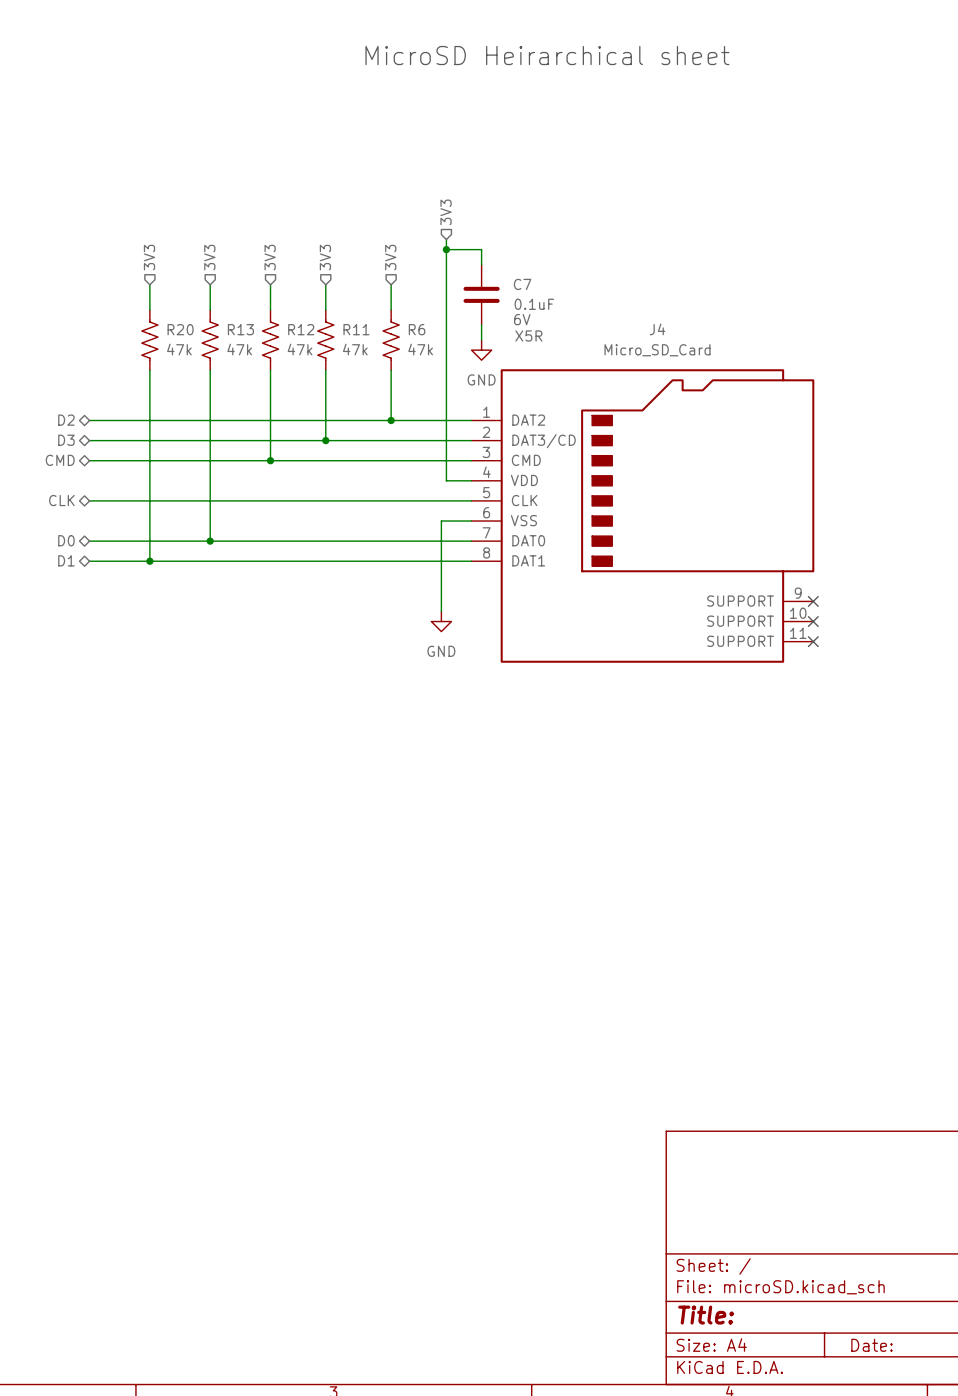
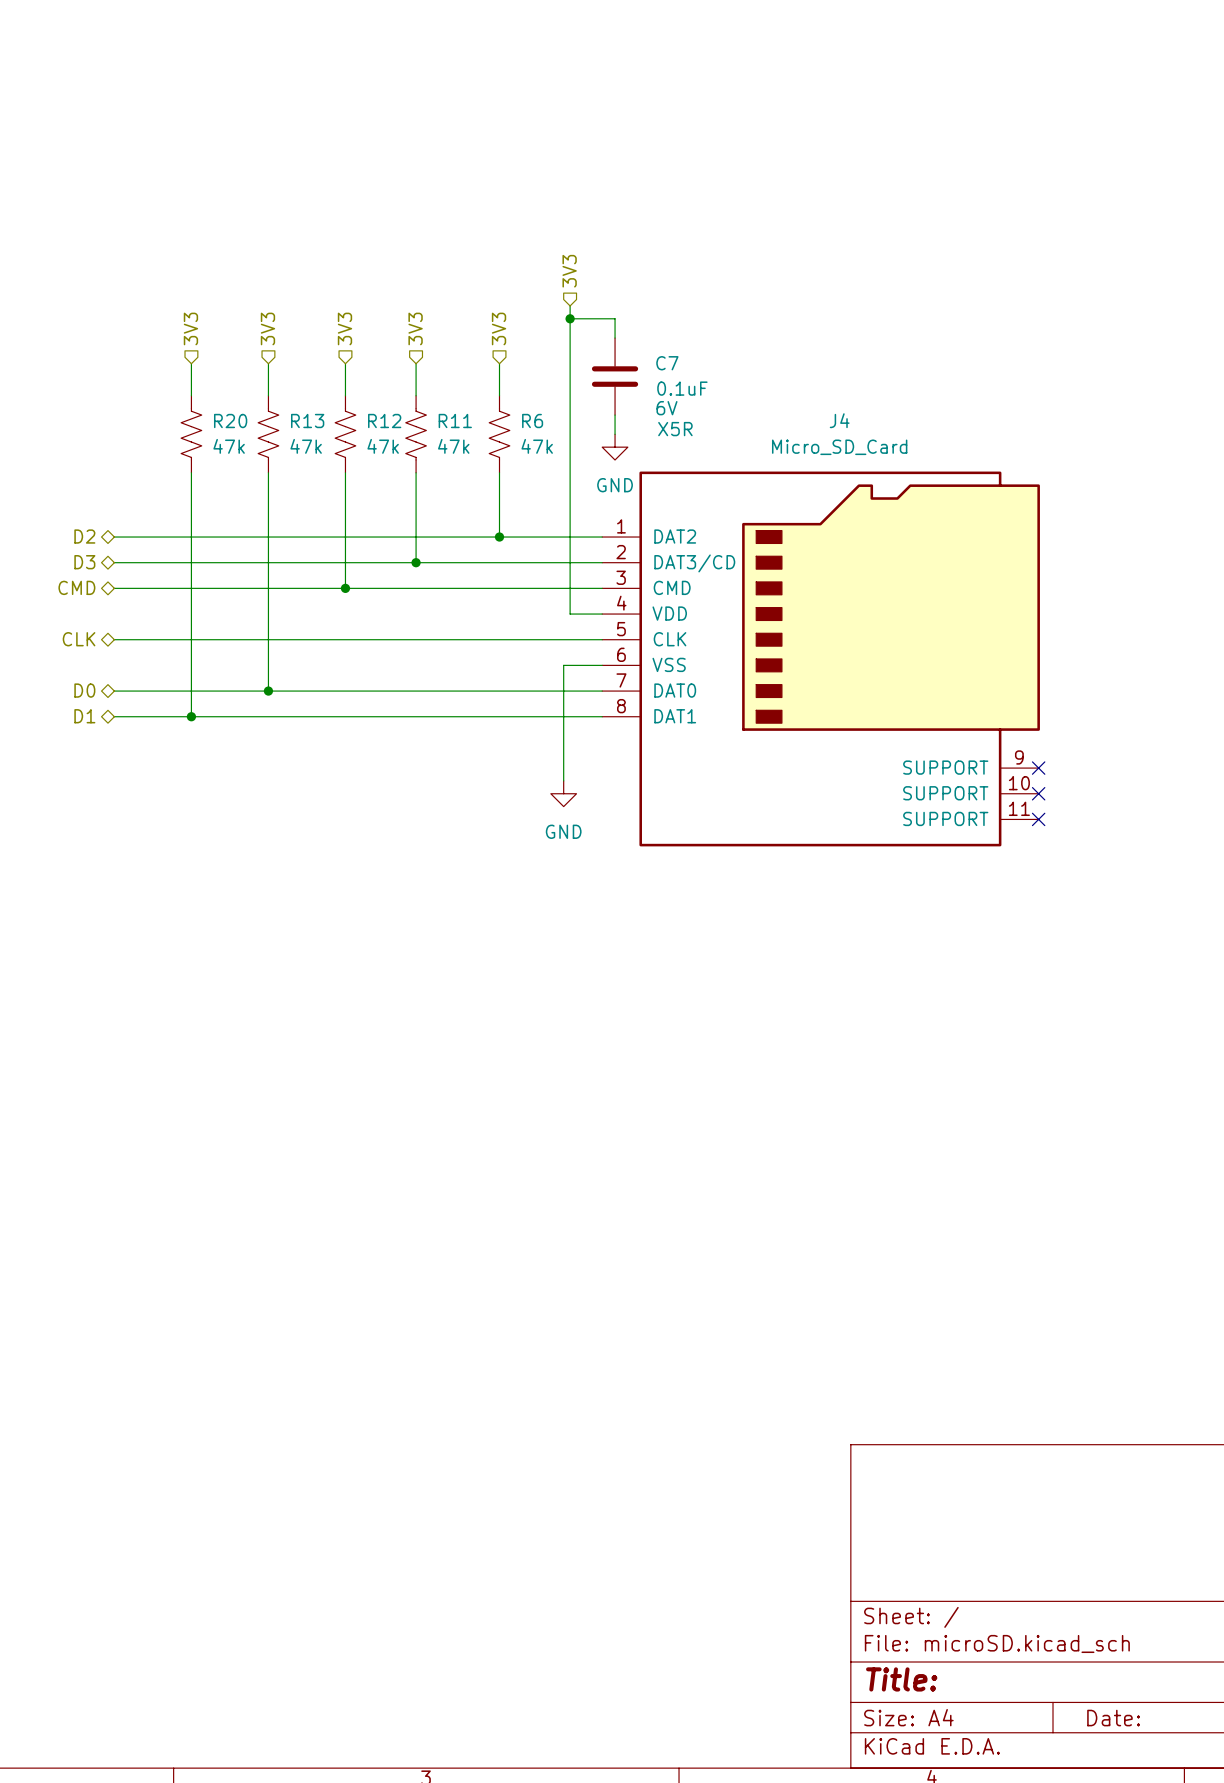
text: MicroSD Heirarchical sheet (547, 55) -> none

